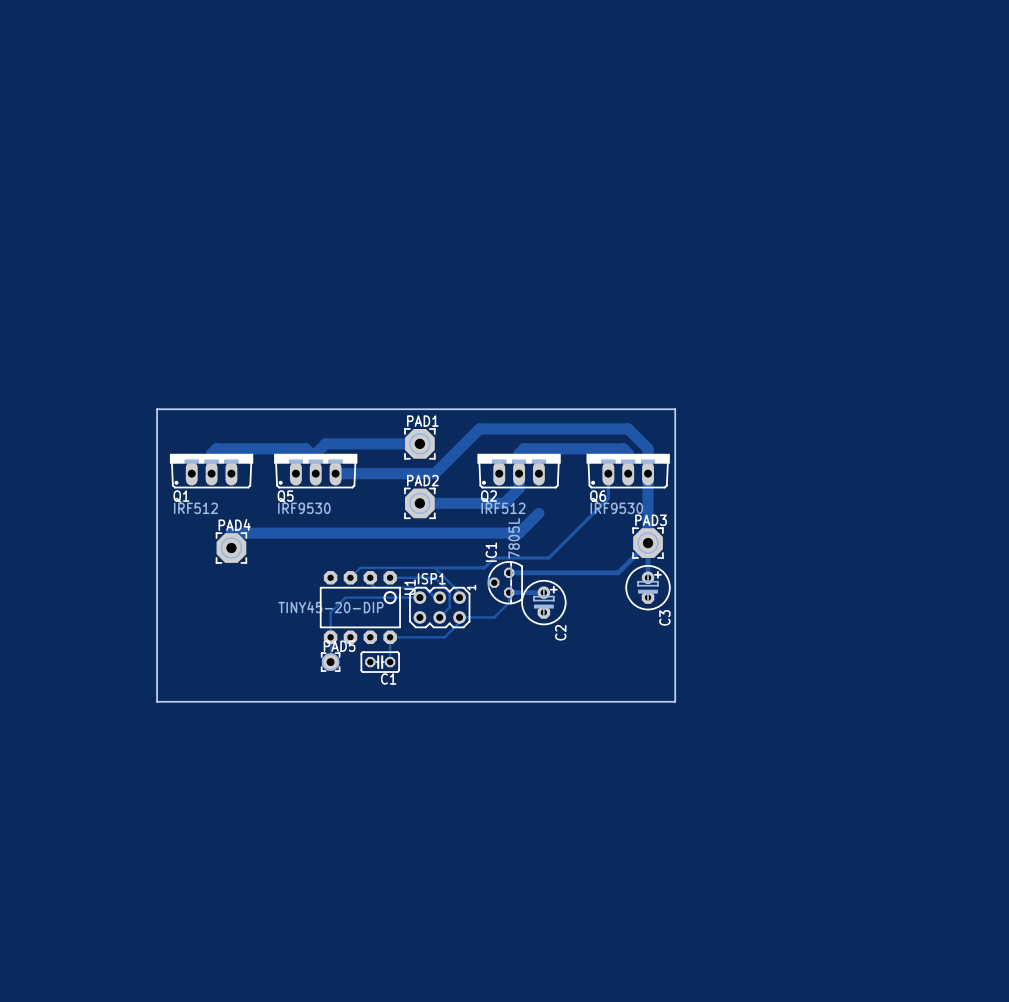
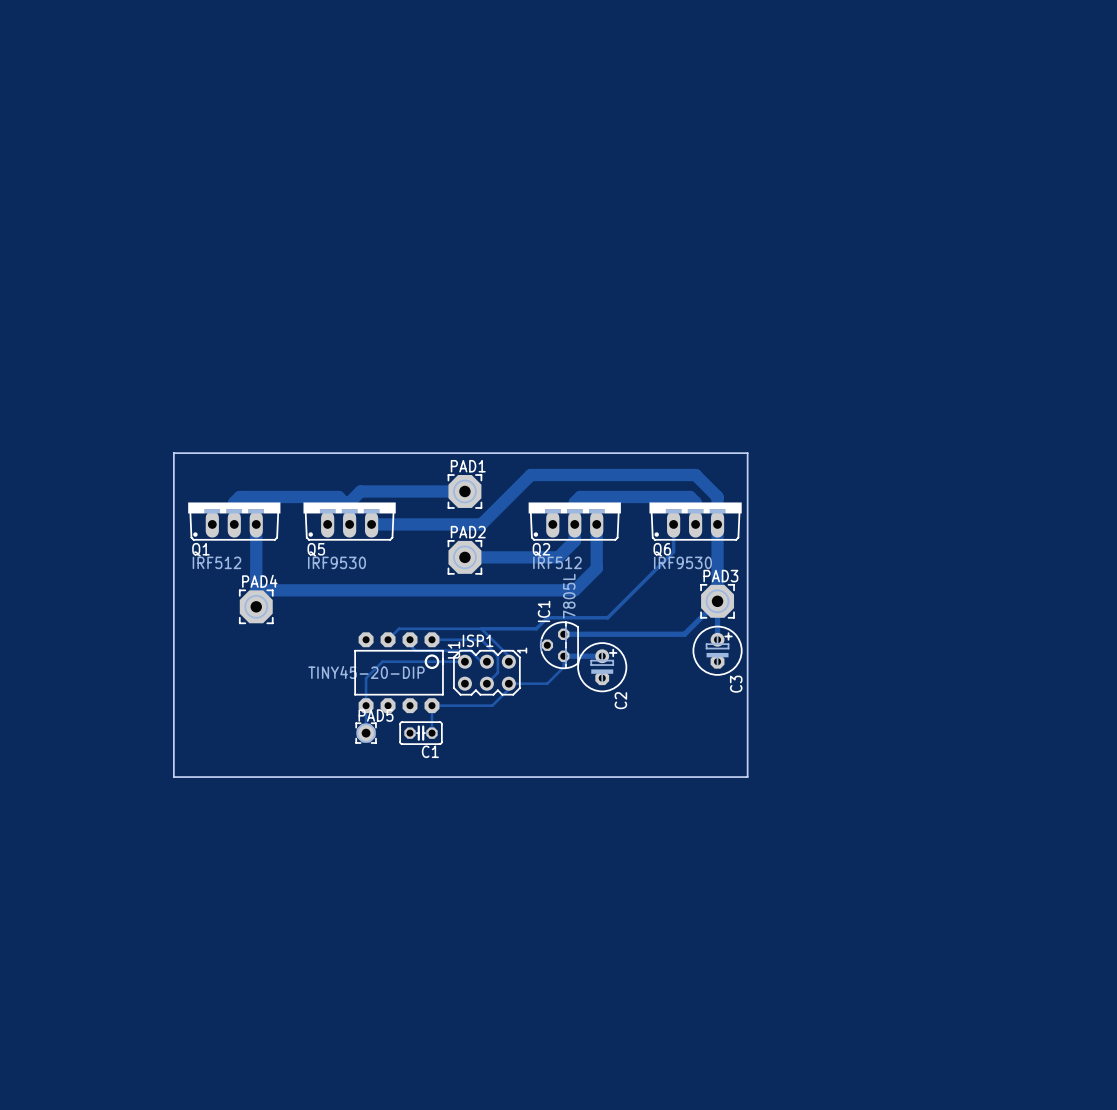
track: none -> (256, 524) (256, 590)
track: none -> (596, 524) (596, 568)

